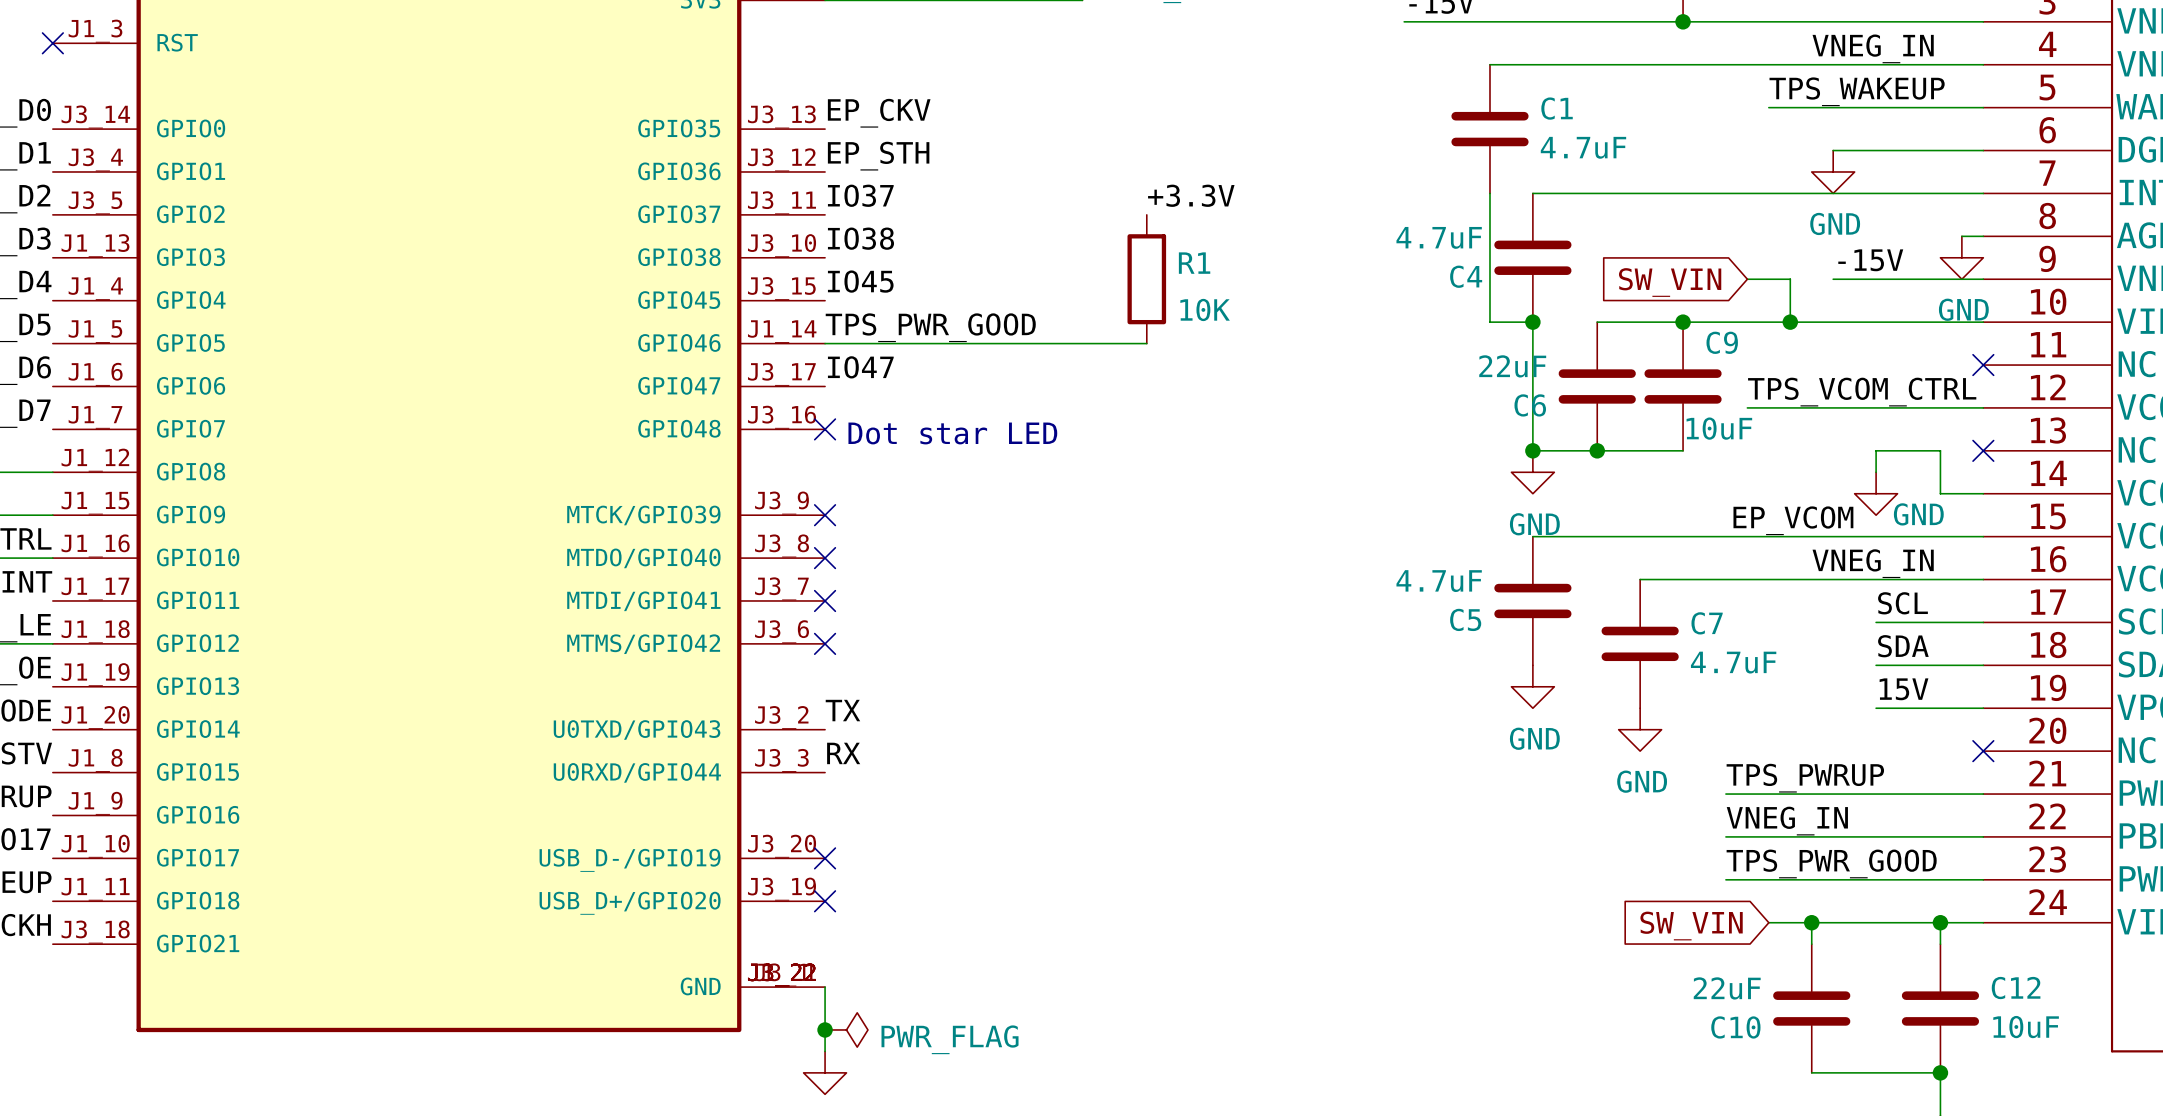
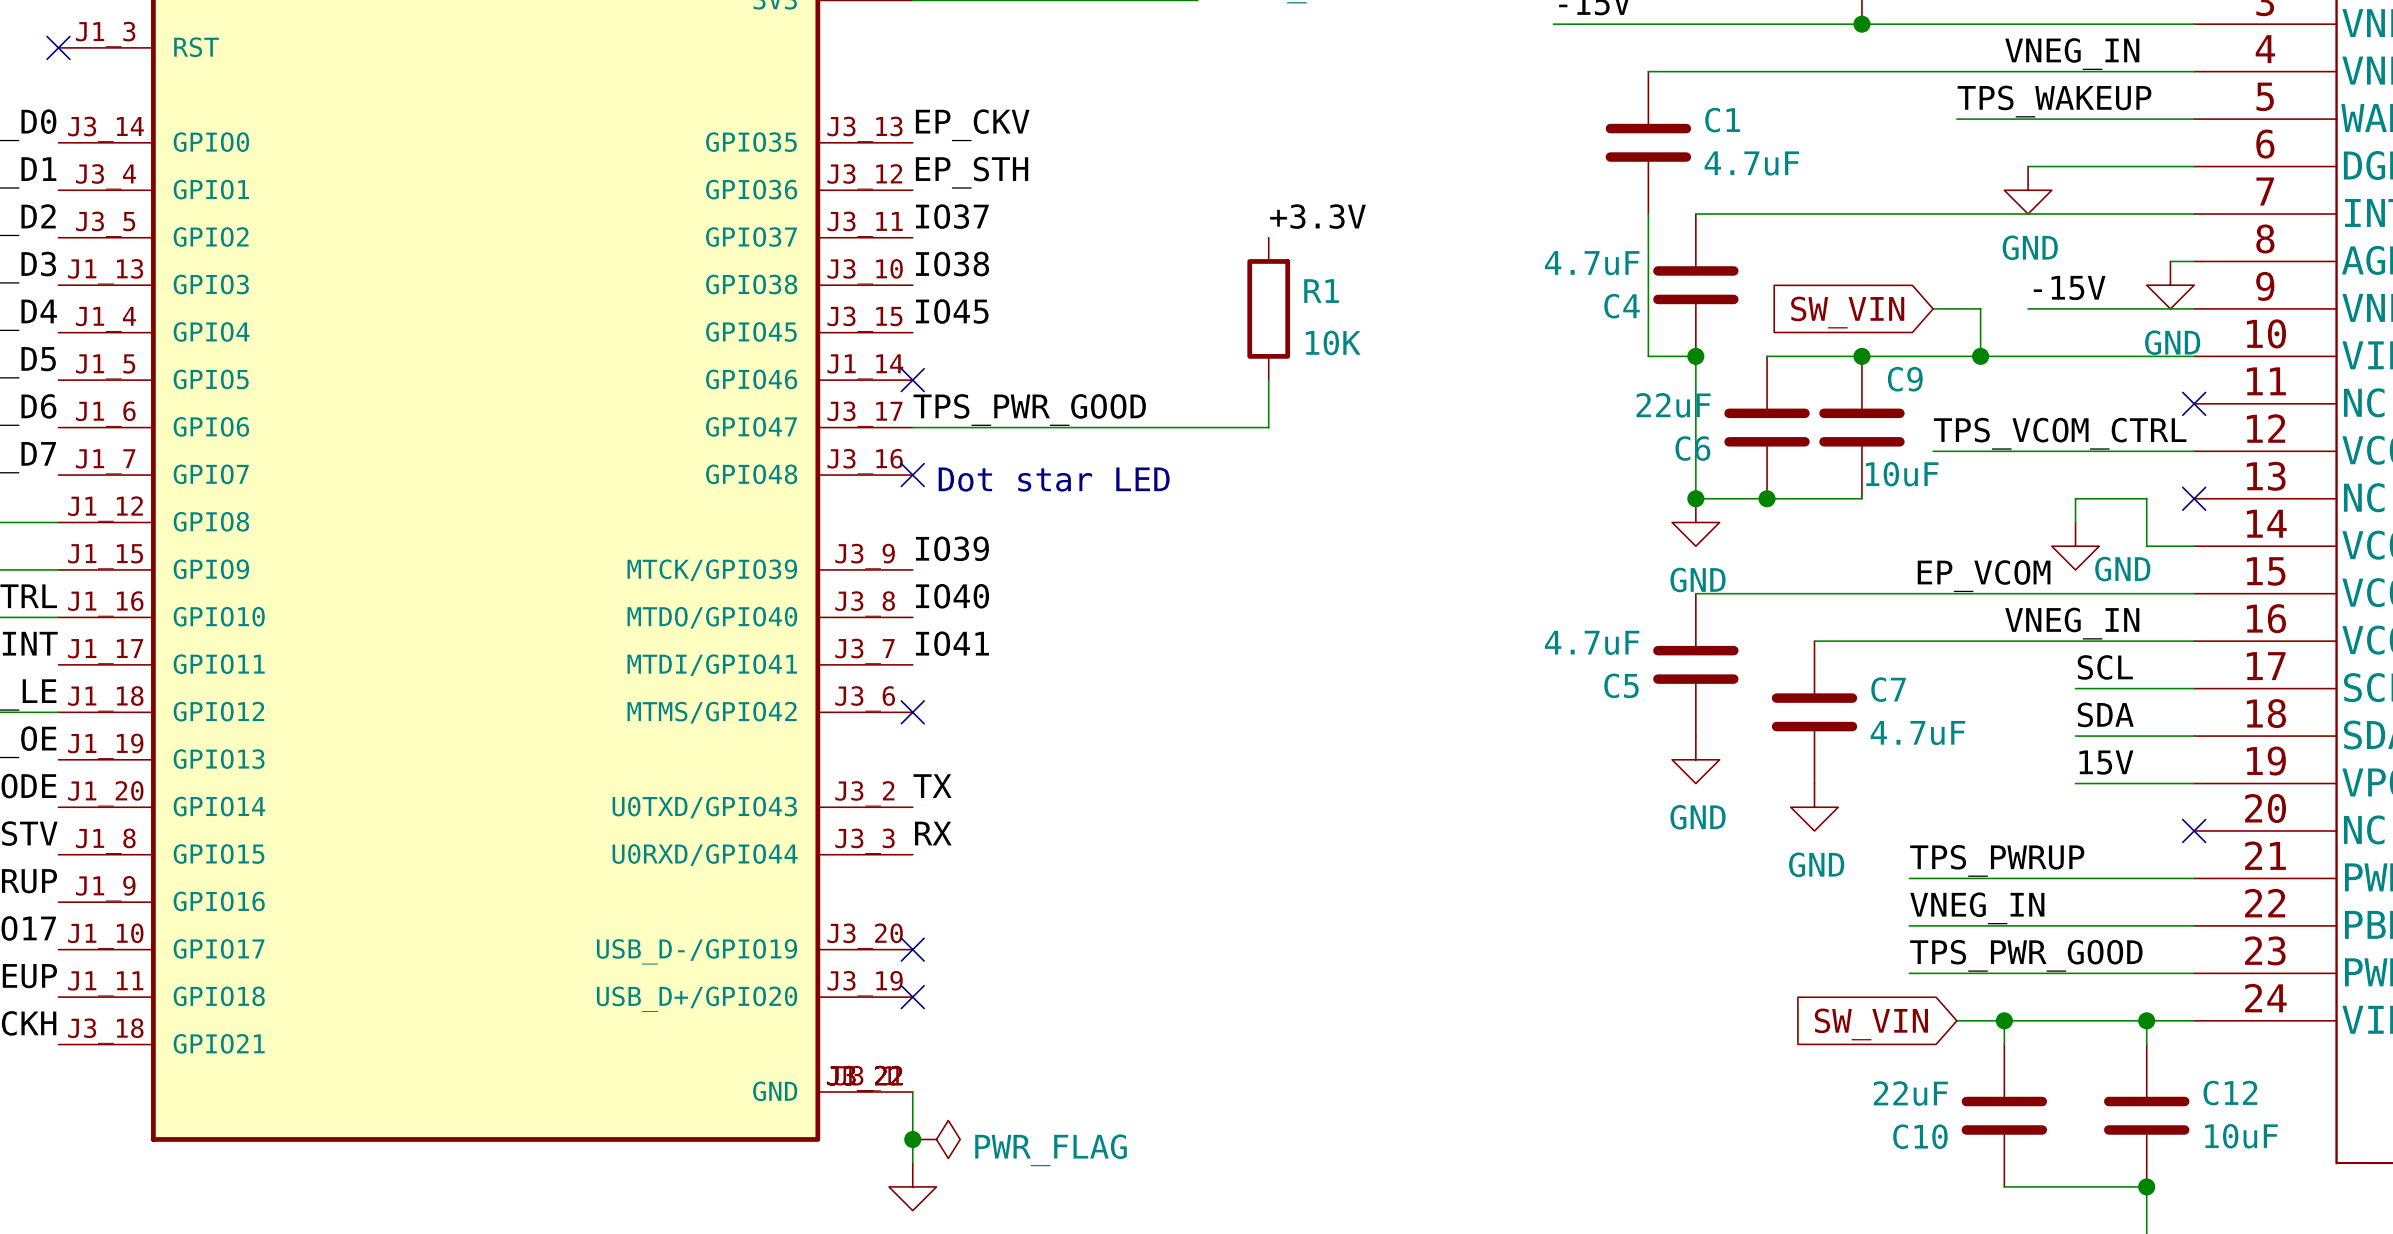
label: TPS_PWR_GOOD (930, 327) -> none
wire: (825, 343) (1146, 343) -> (912, 427) (1268, 427) (1268, 380)
no-connect mark: none -> (912, 380)
label: IO47 (860, 367) -> TPS_PWR_GOOD (1029, 410)
label: none -> IO39 (952, 548)
no-connect mark: (825, 515) -> none
label: none -> IO40 (952, 596)
no-connect mark: (825, 558) -> none
label: none -> IO41 (952, 643)
no-connect mark: (825, 600) -> none

